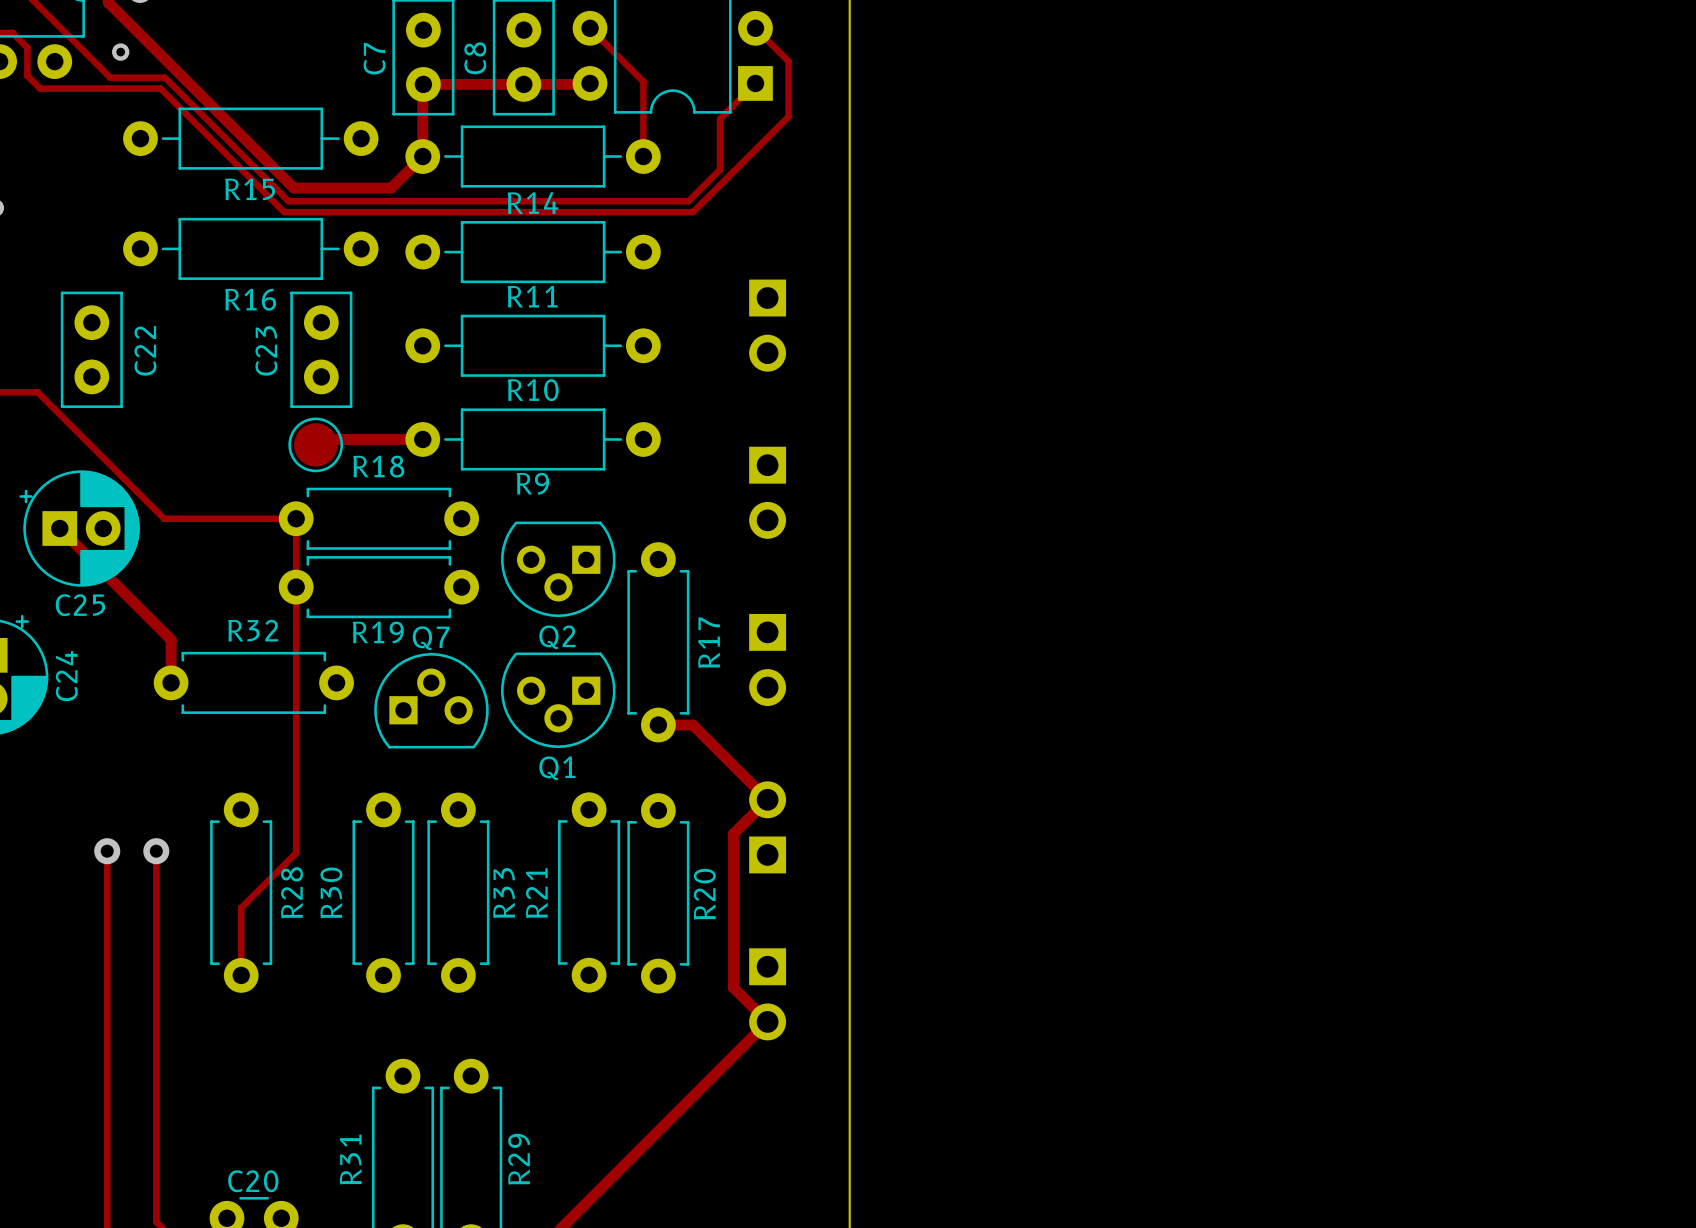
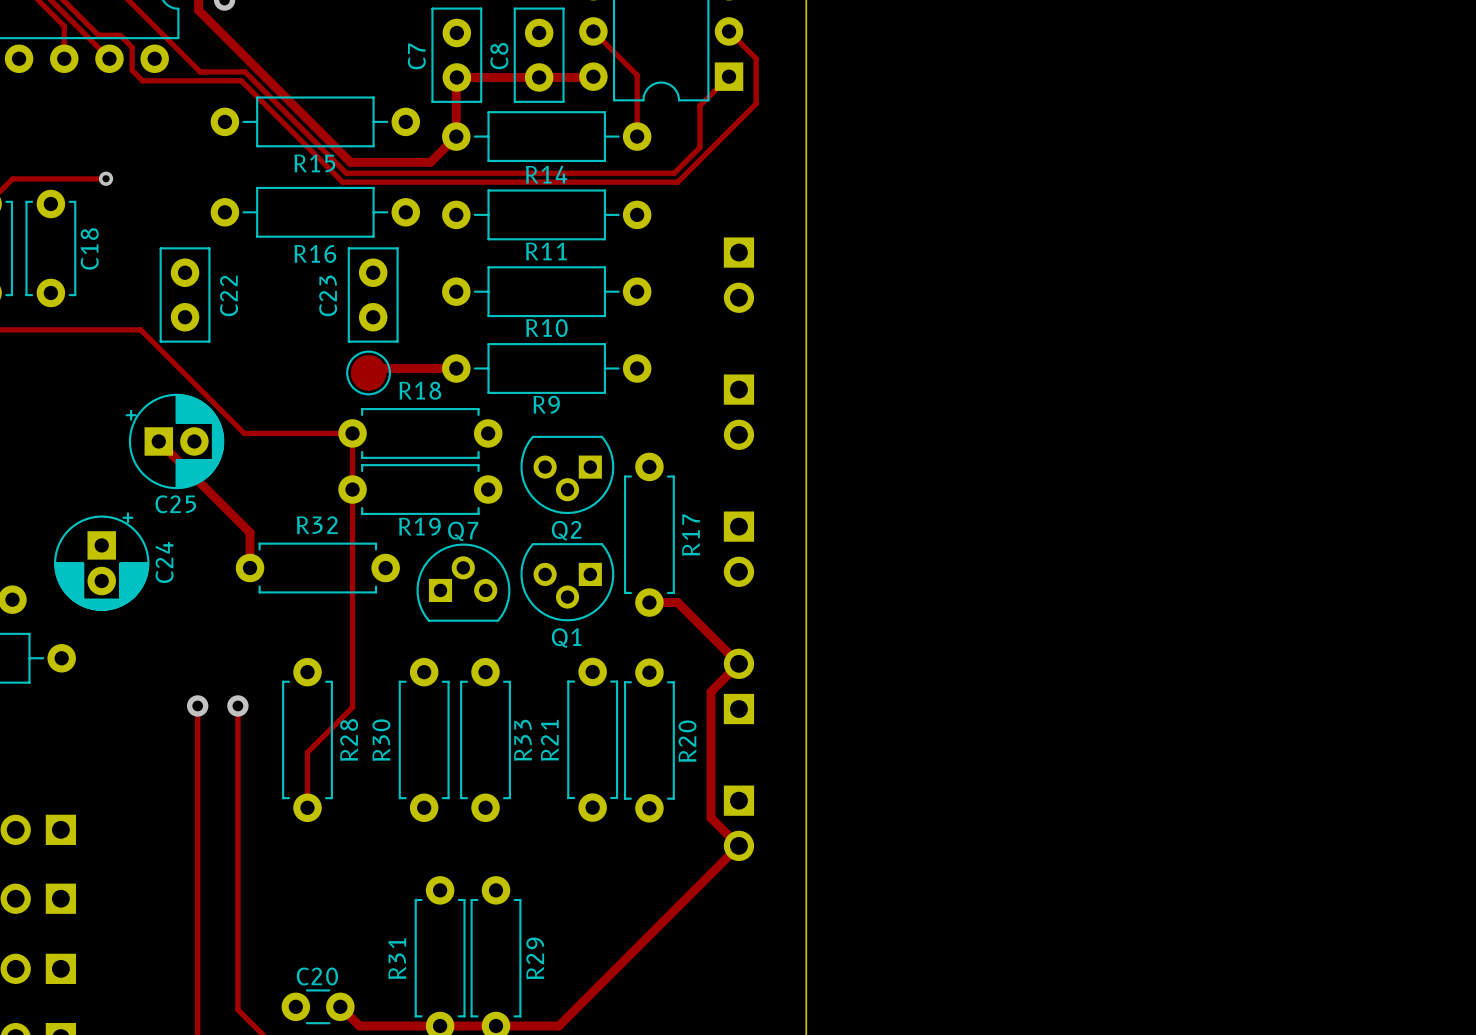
via: (120, 52) -> none

